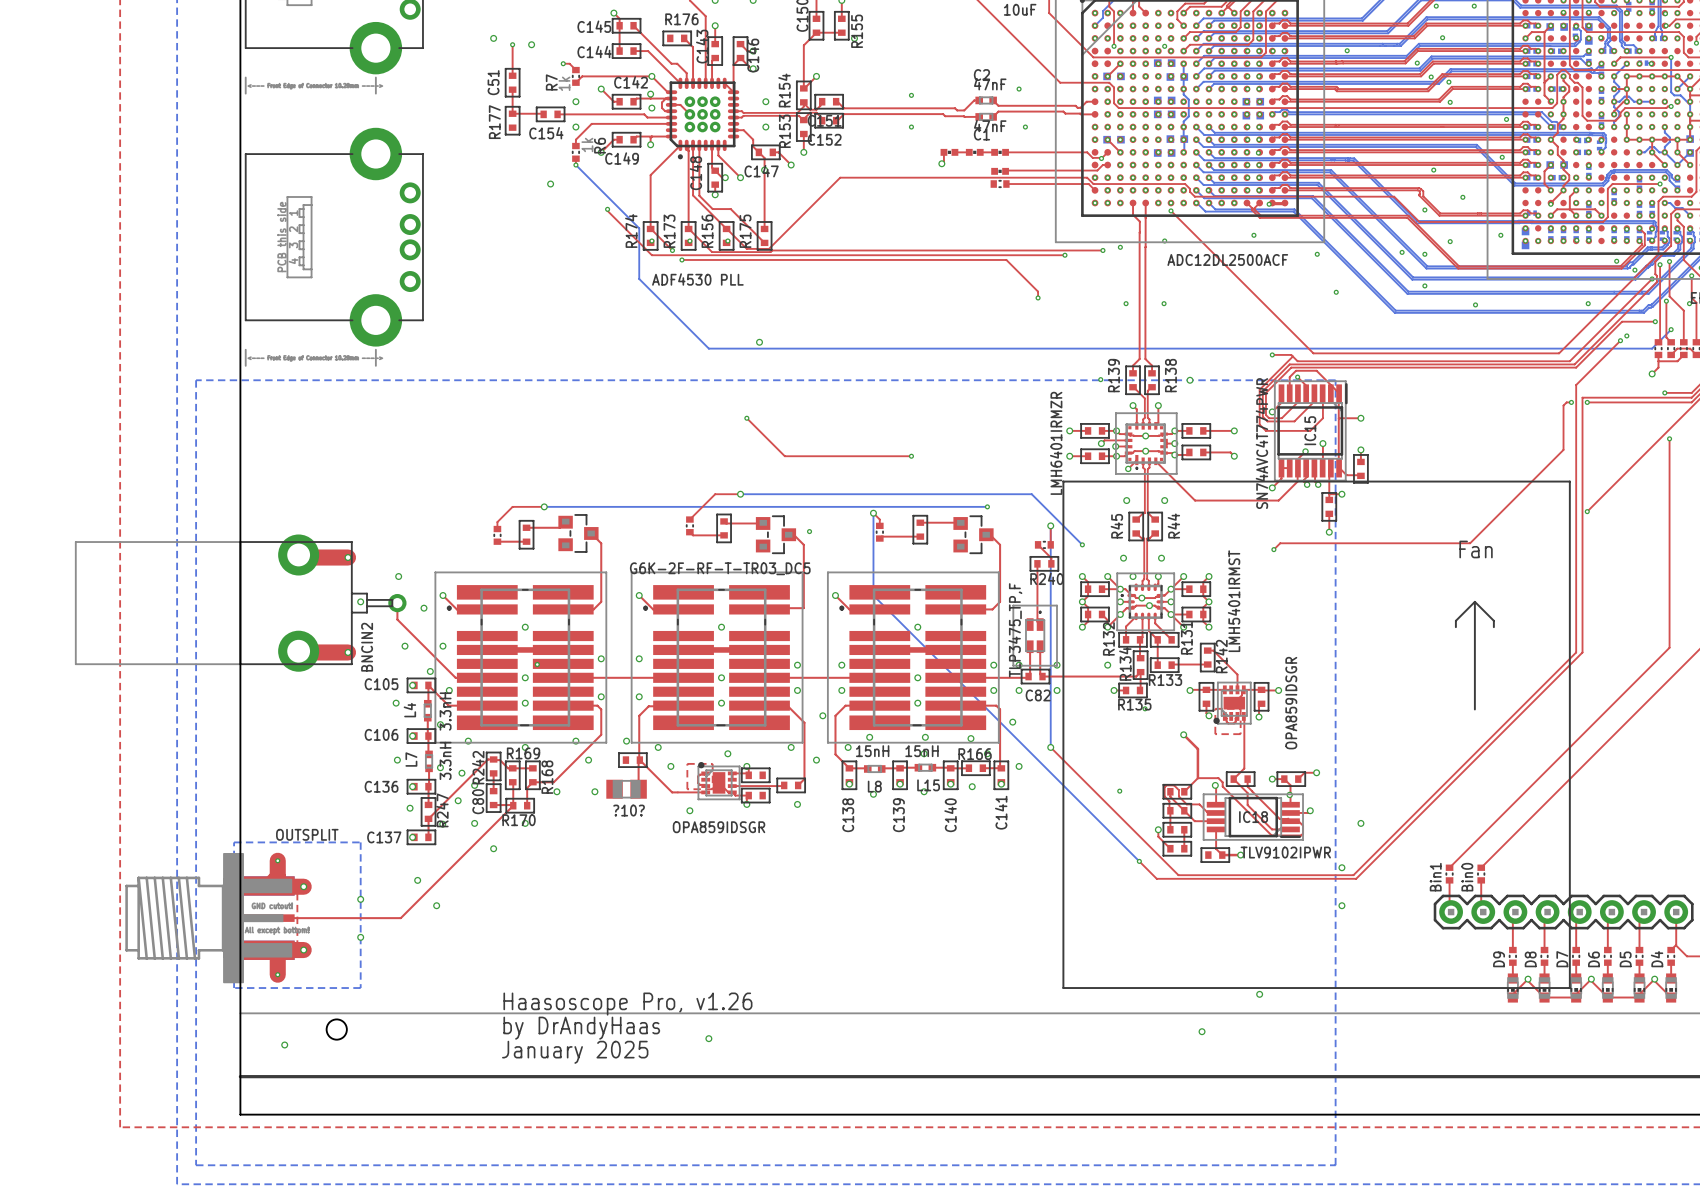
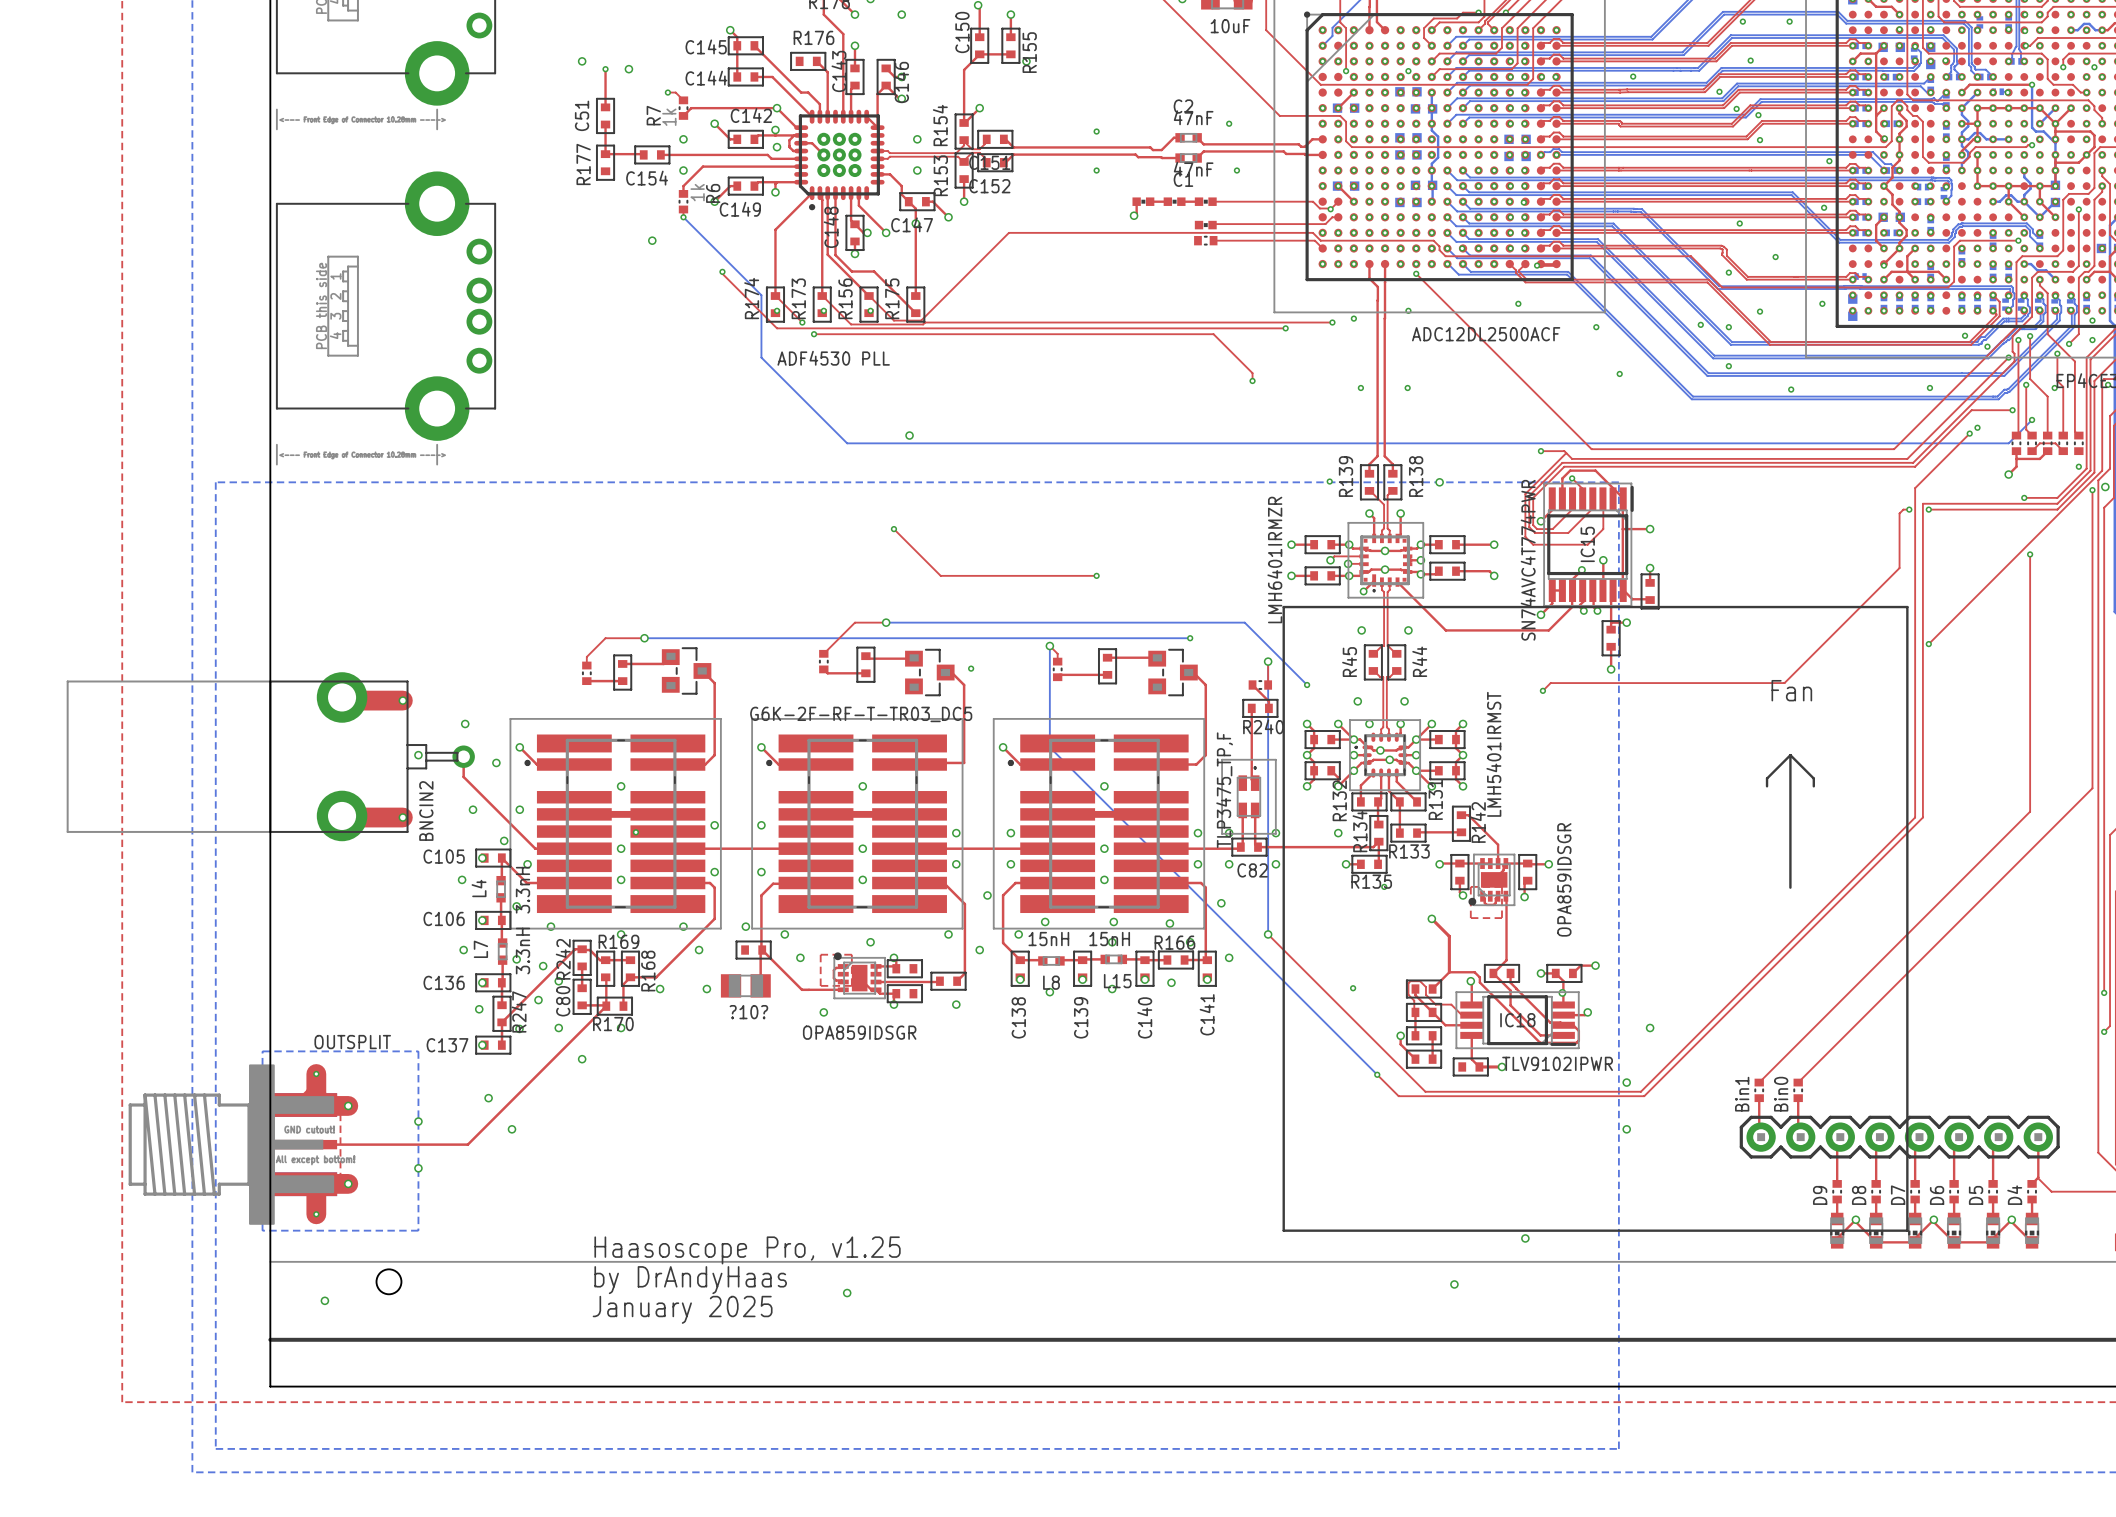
text: Haasoscope Pro, v1.26 (627, 1004) -> Haasoscope Pro, v1.25 (747, 1250)

